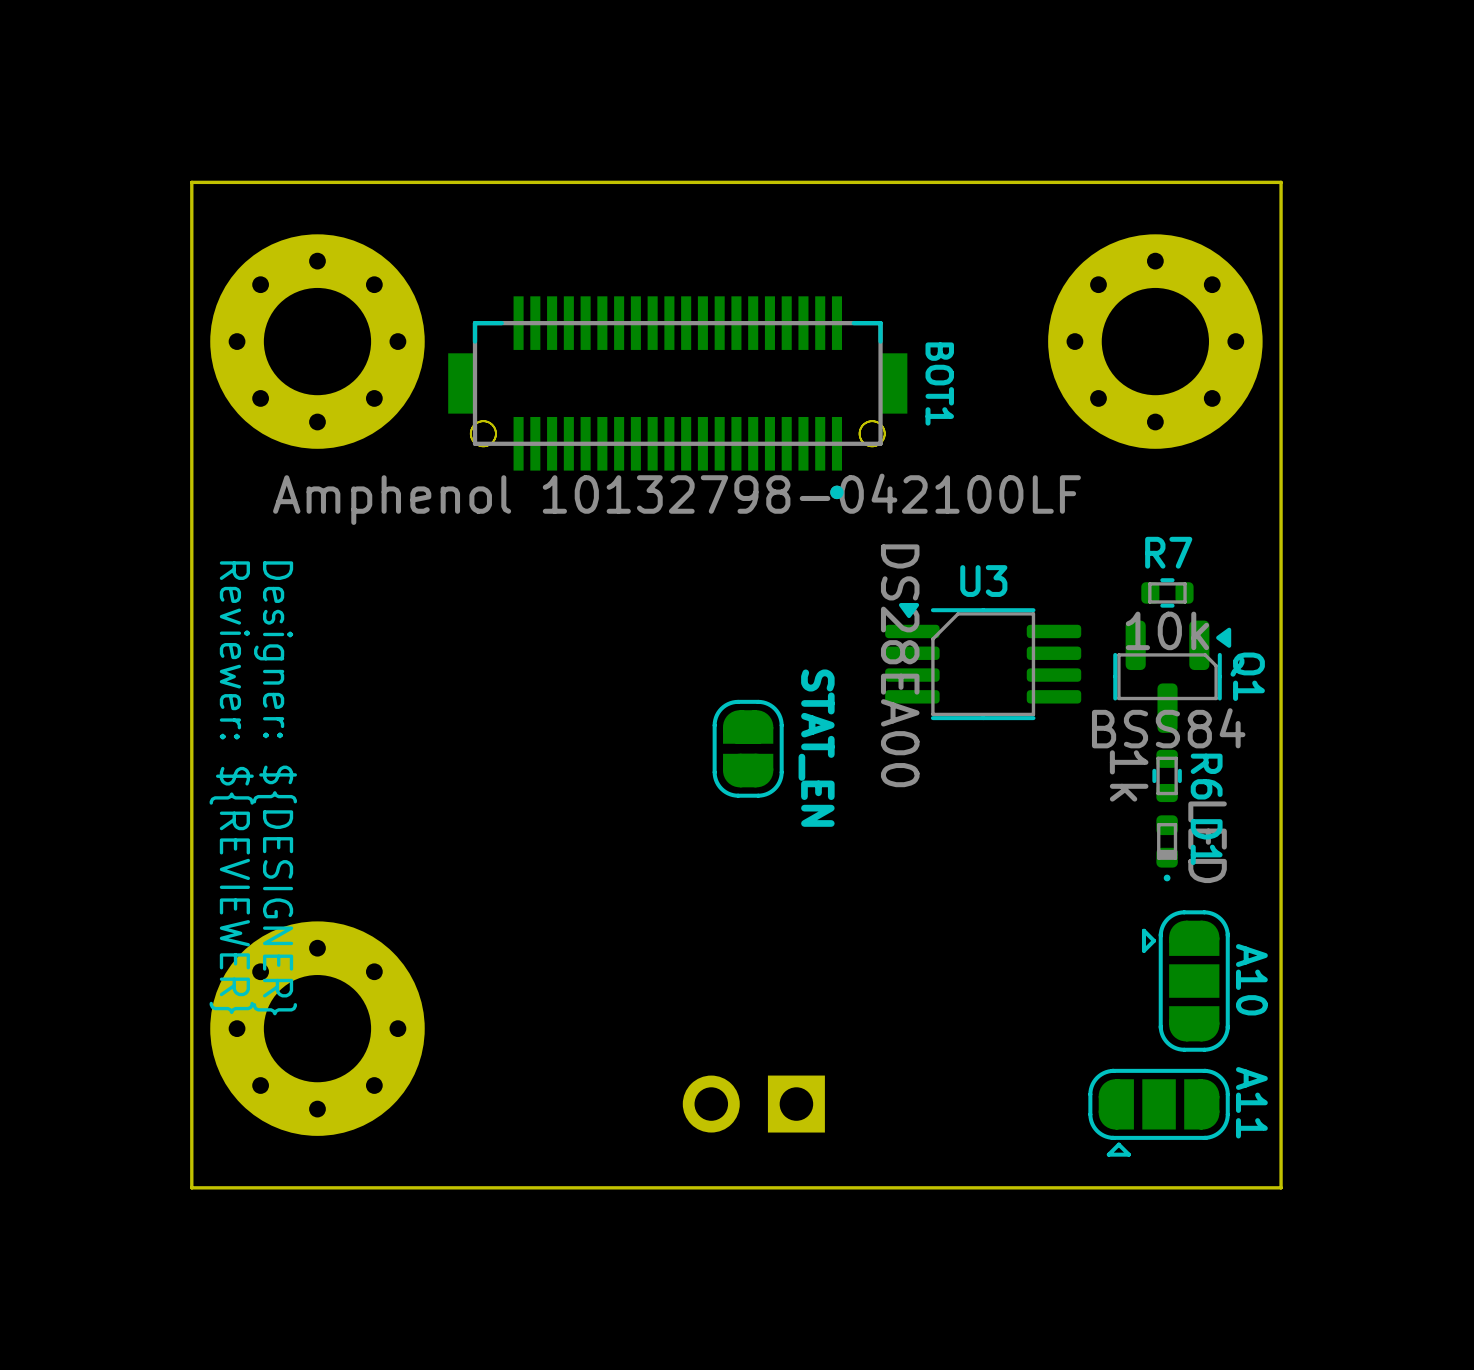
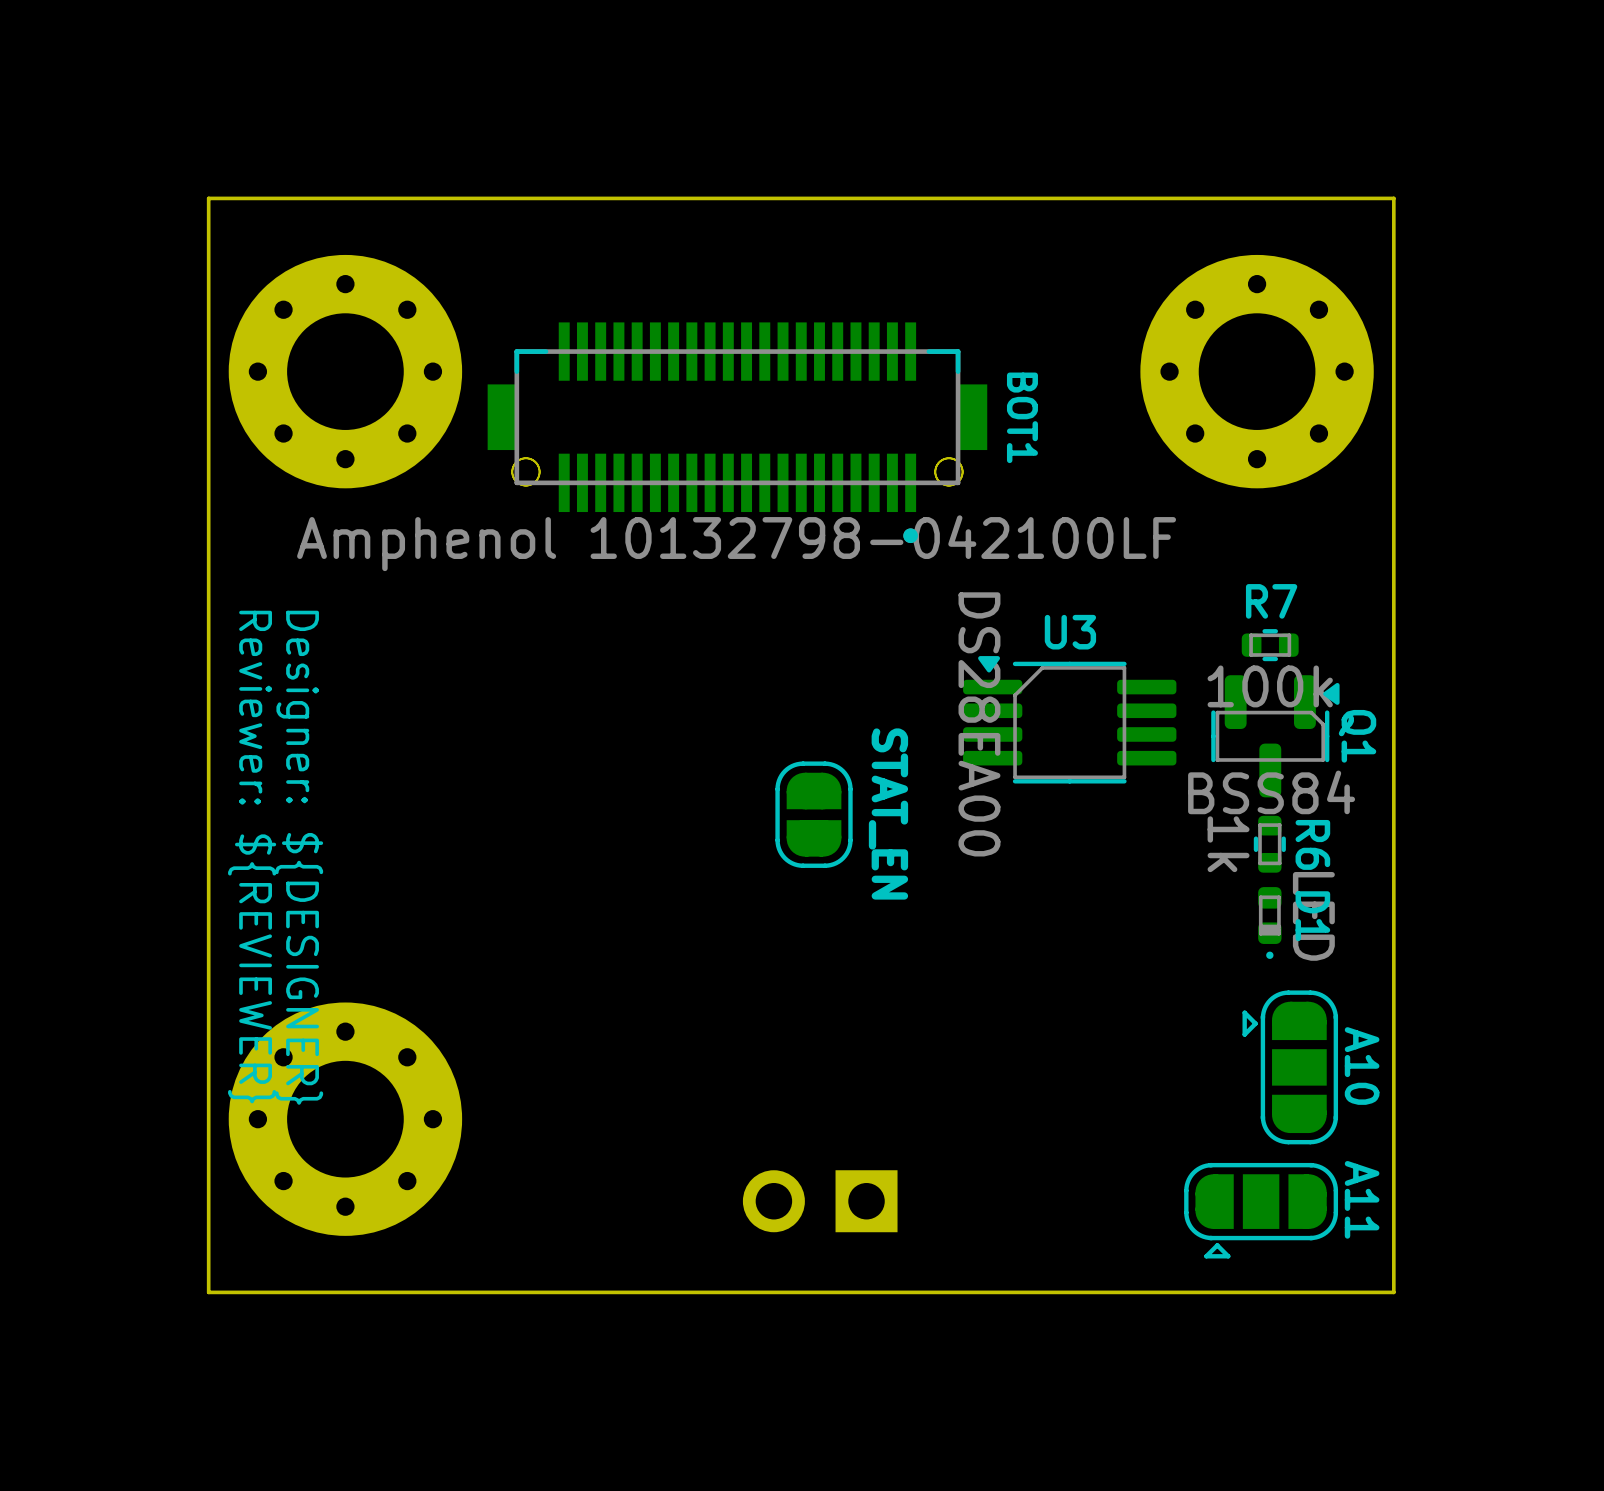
R7 value: 10k (1167, 630) -> 100k (1270, 686)

